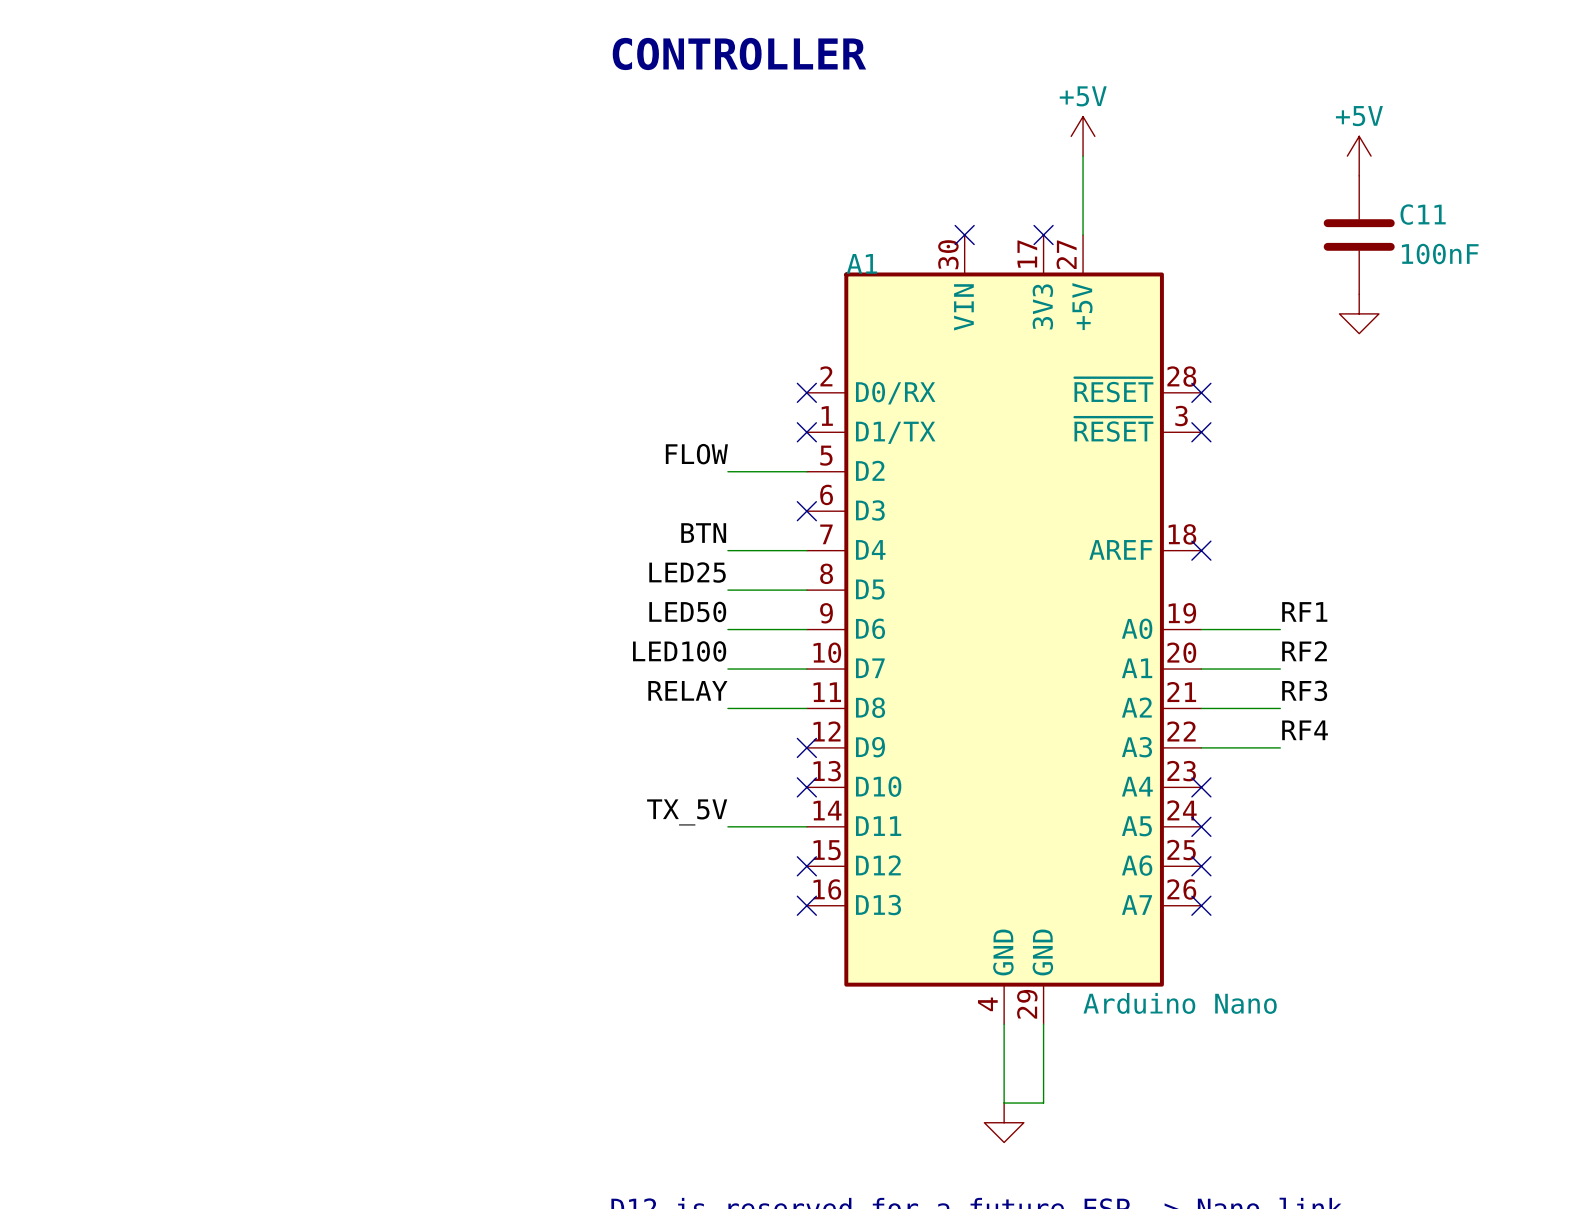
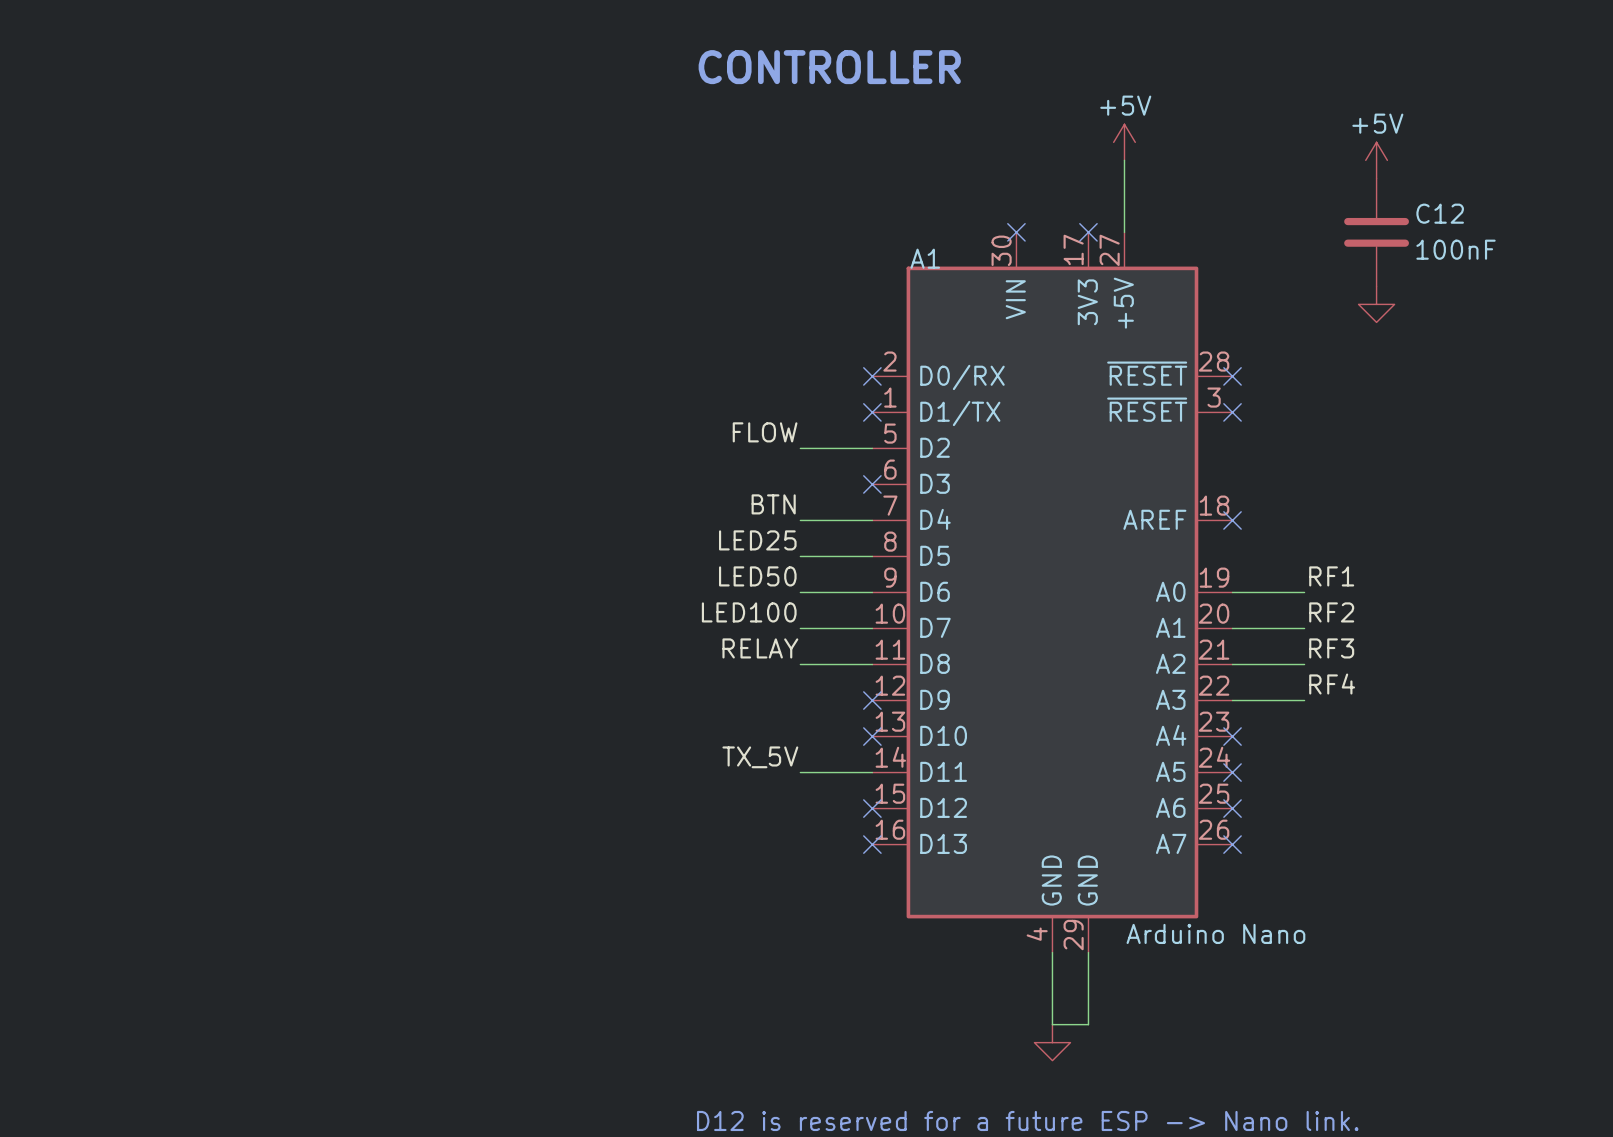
C11 name: C11 (1423, 214) -> C12 (1440, 213)

